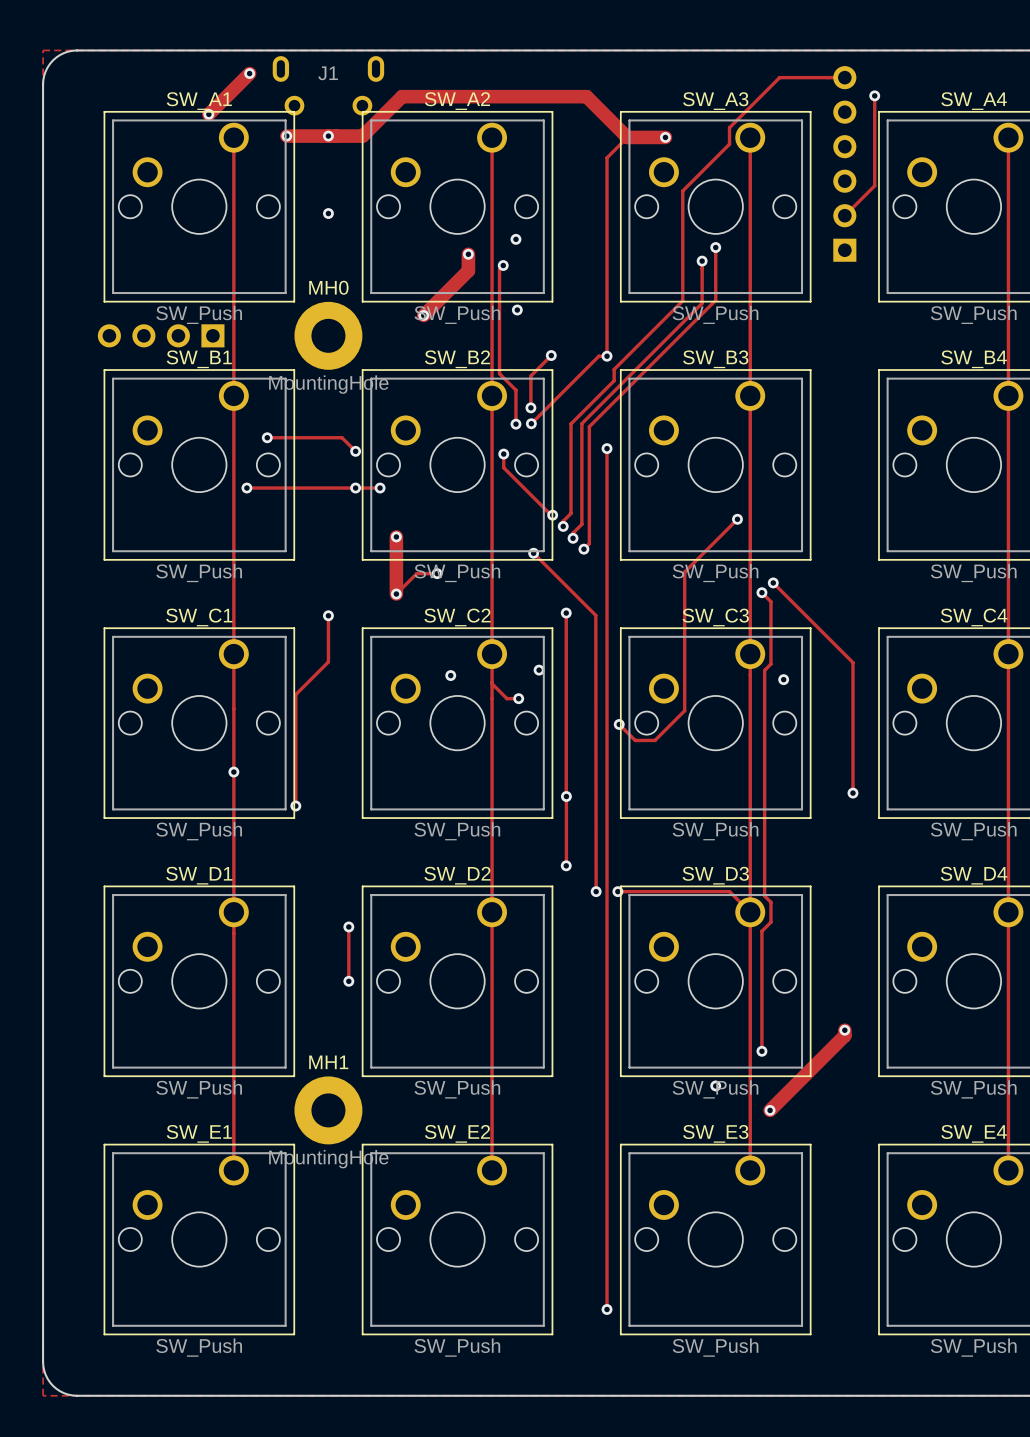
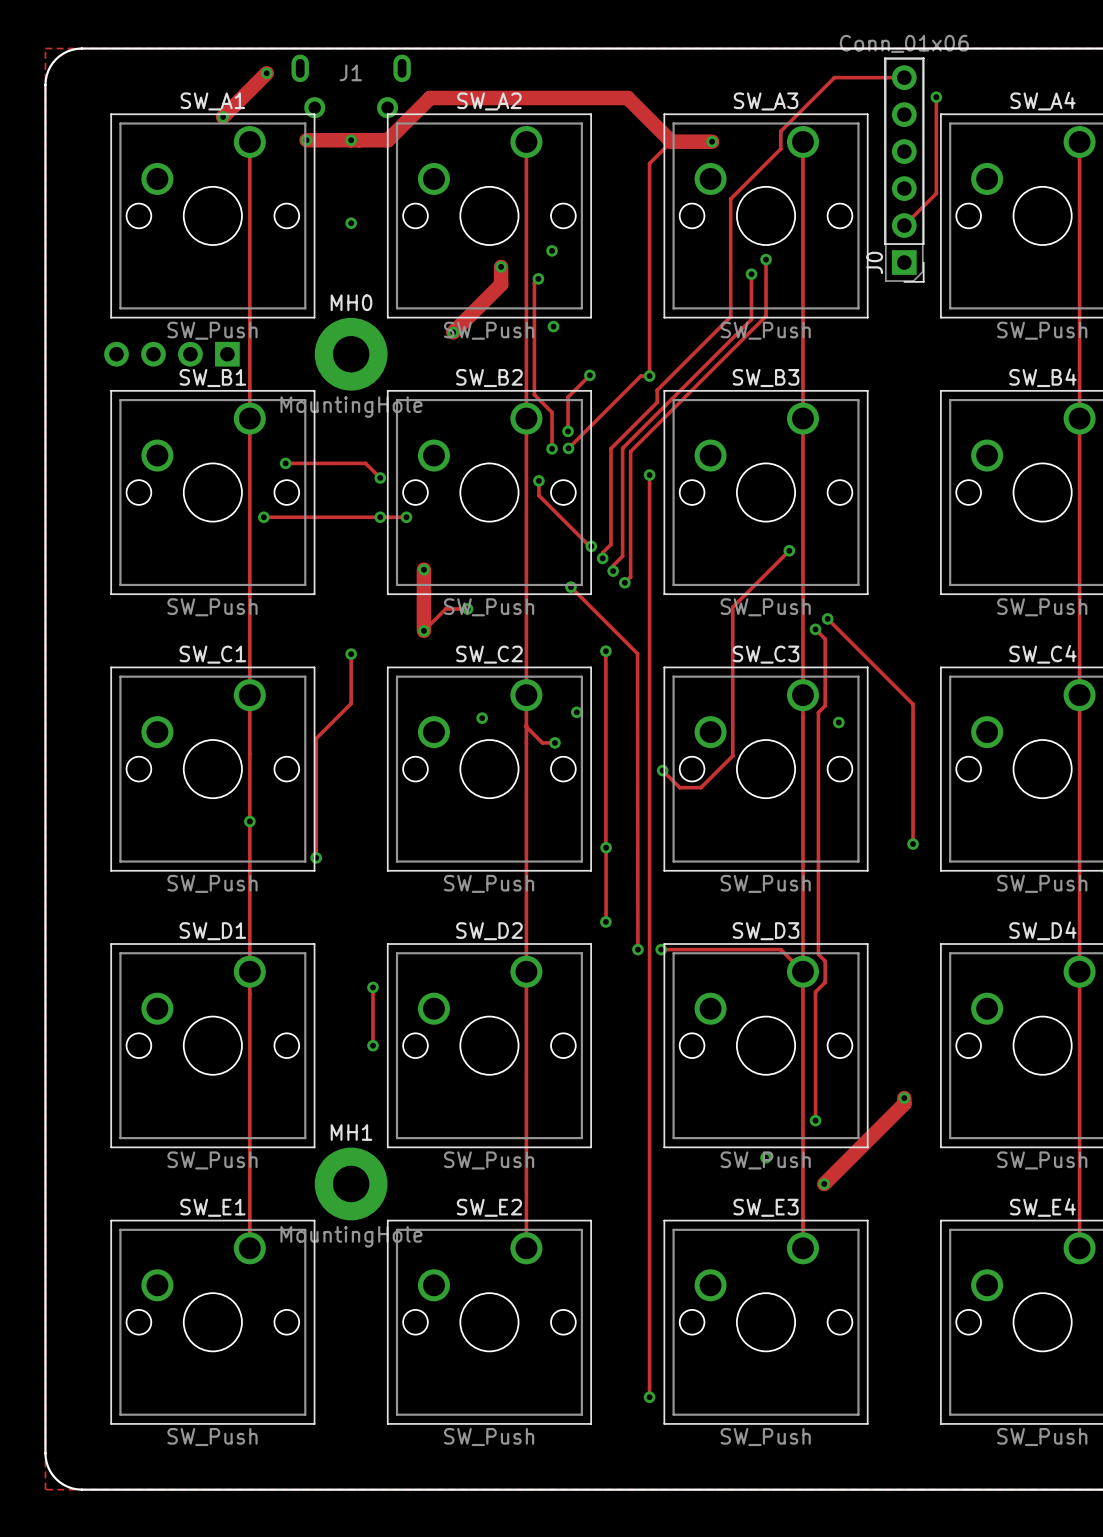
J0 side: bottom (844, 163) -> top (904, 170)

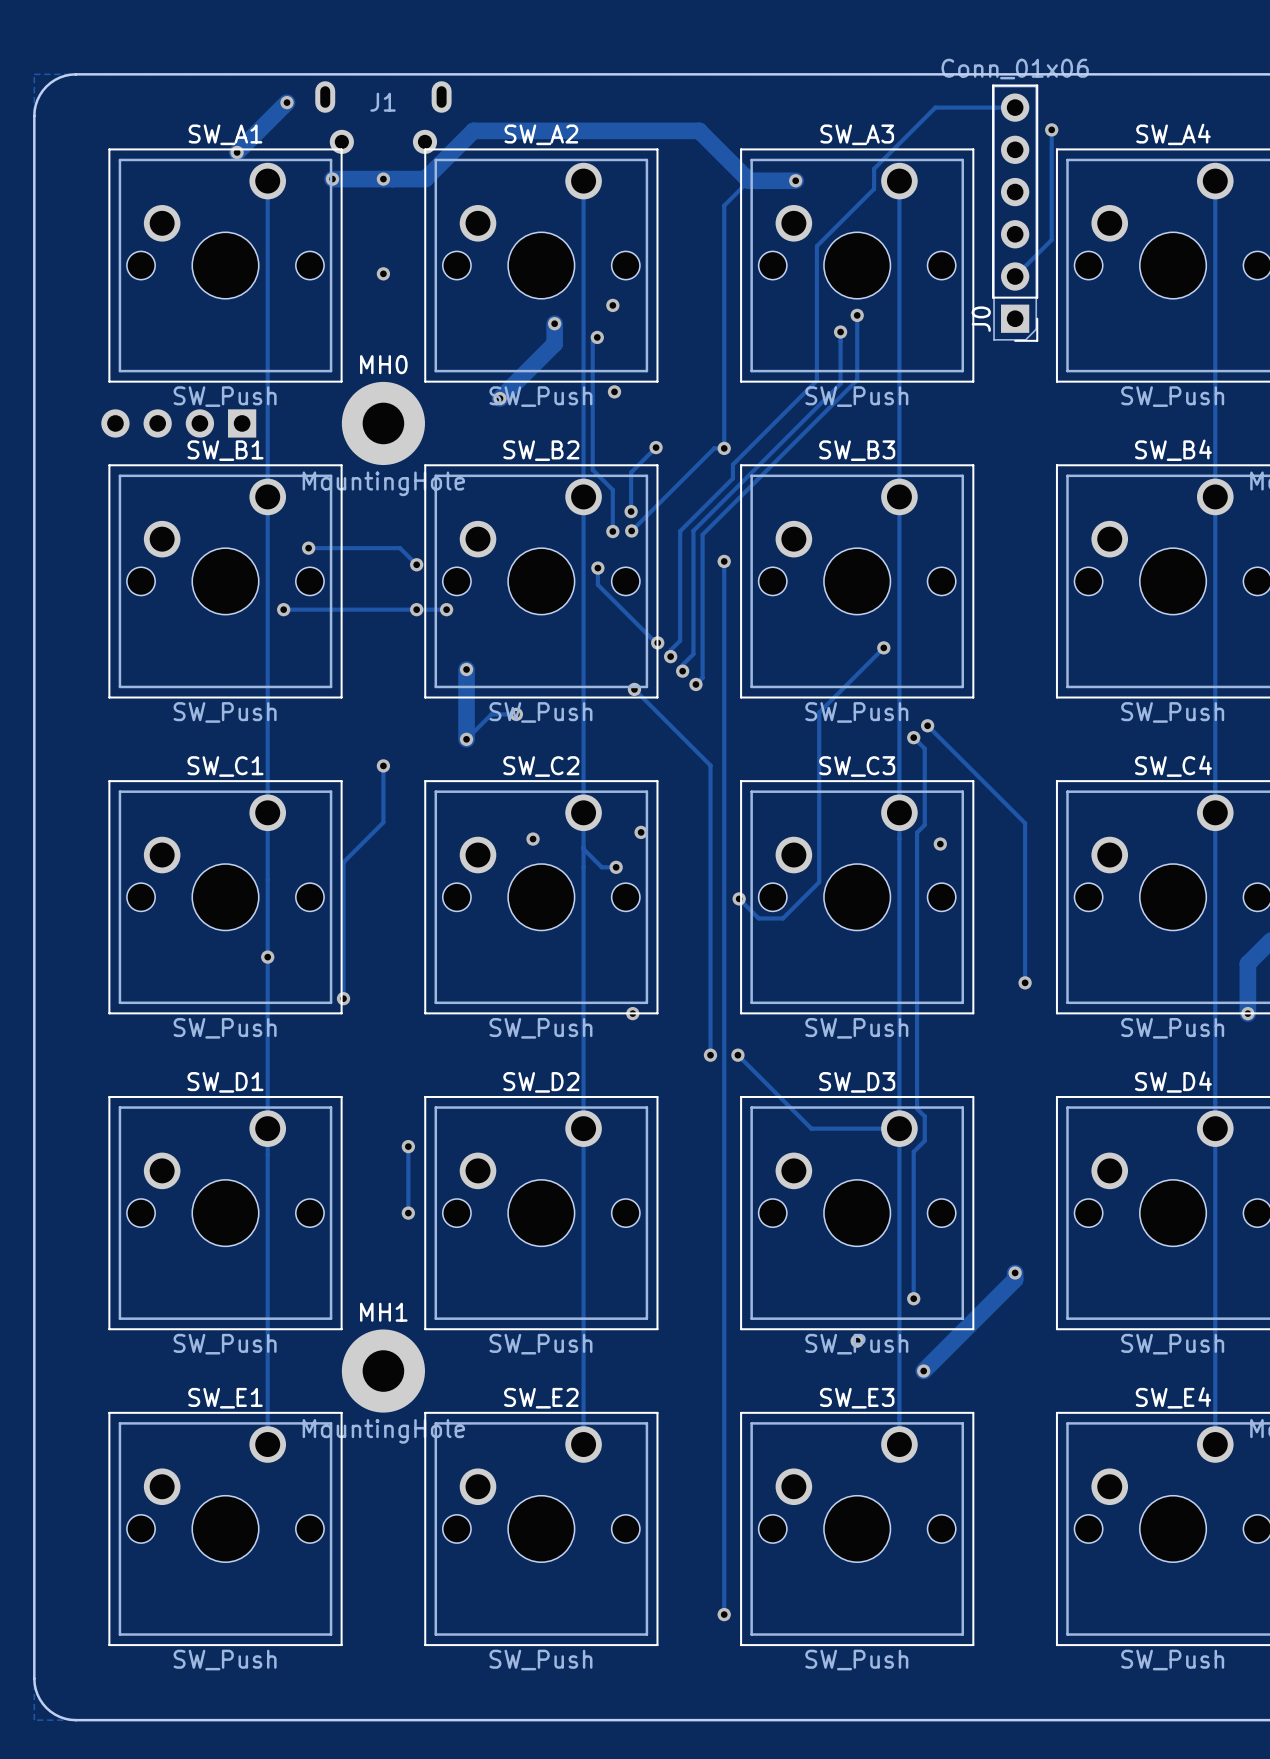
track: (605, 651) (605, 847) -> none
via: (605, 651) -> none
track: (637, 653) (637, 949) -> (710, 765) (710, 1055)
track: (606, 847) (606, 921) -> none
via: (606, 847) -> none
via: none -> (632, 1013)
via: none -> (710, 1055)
via: none -> (737, 1055)
via: (605, 921) -> none
via: (637, 949) -> none
track: (661, 949) (780, 949) (803, 971) -> (737, 1055) (811, 1128) (899, 1128)
via: (661, 949) -> none

